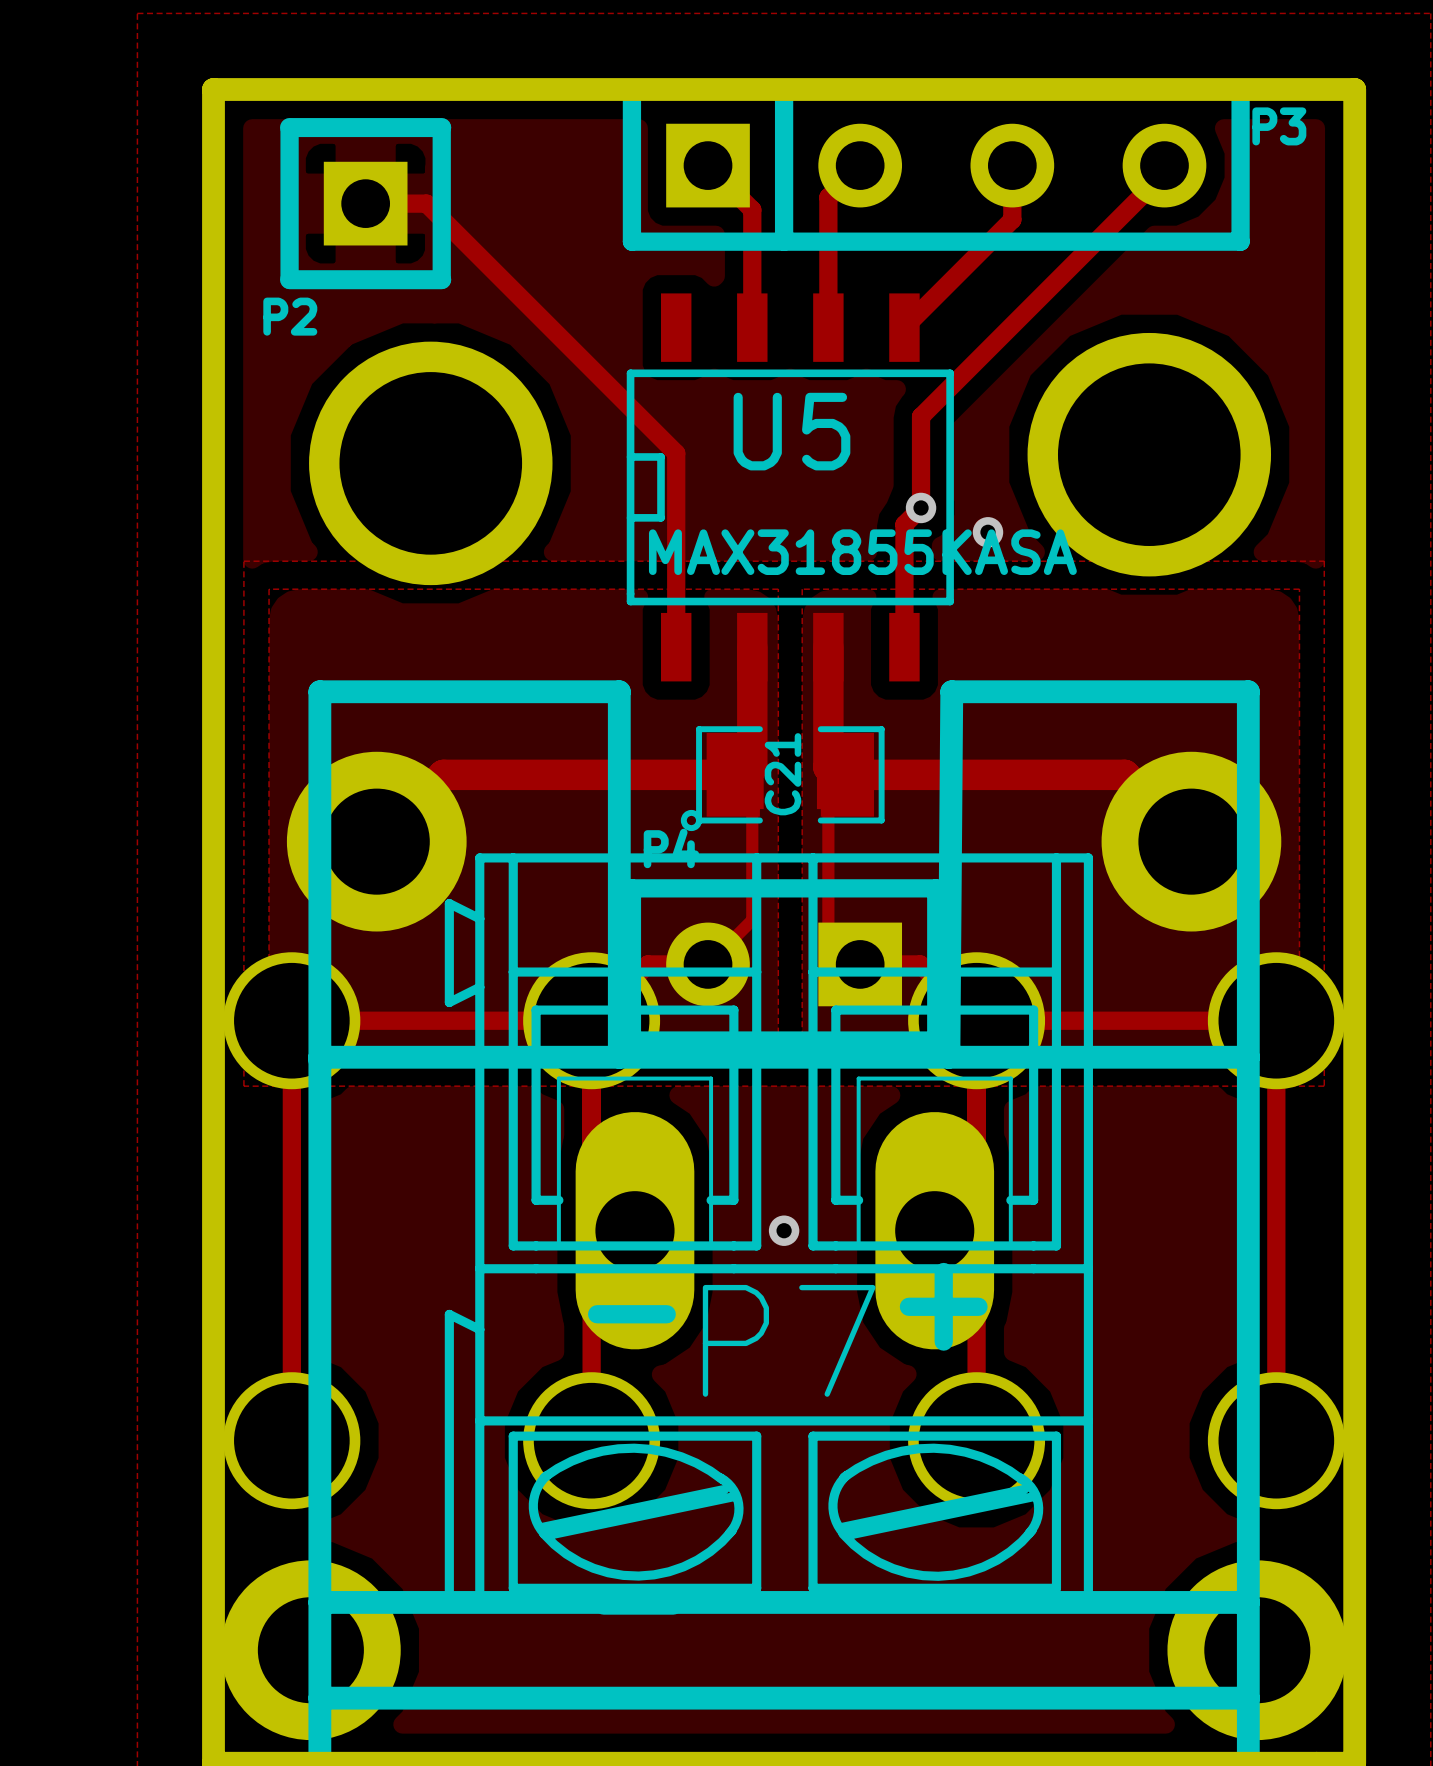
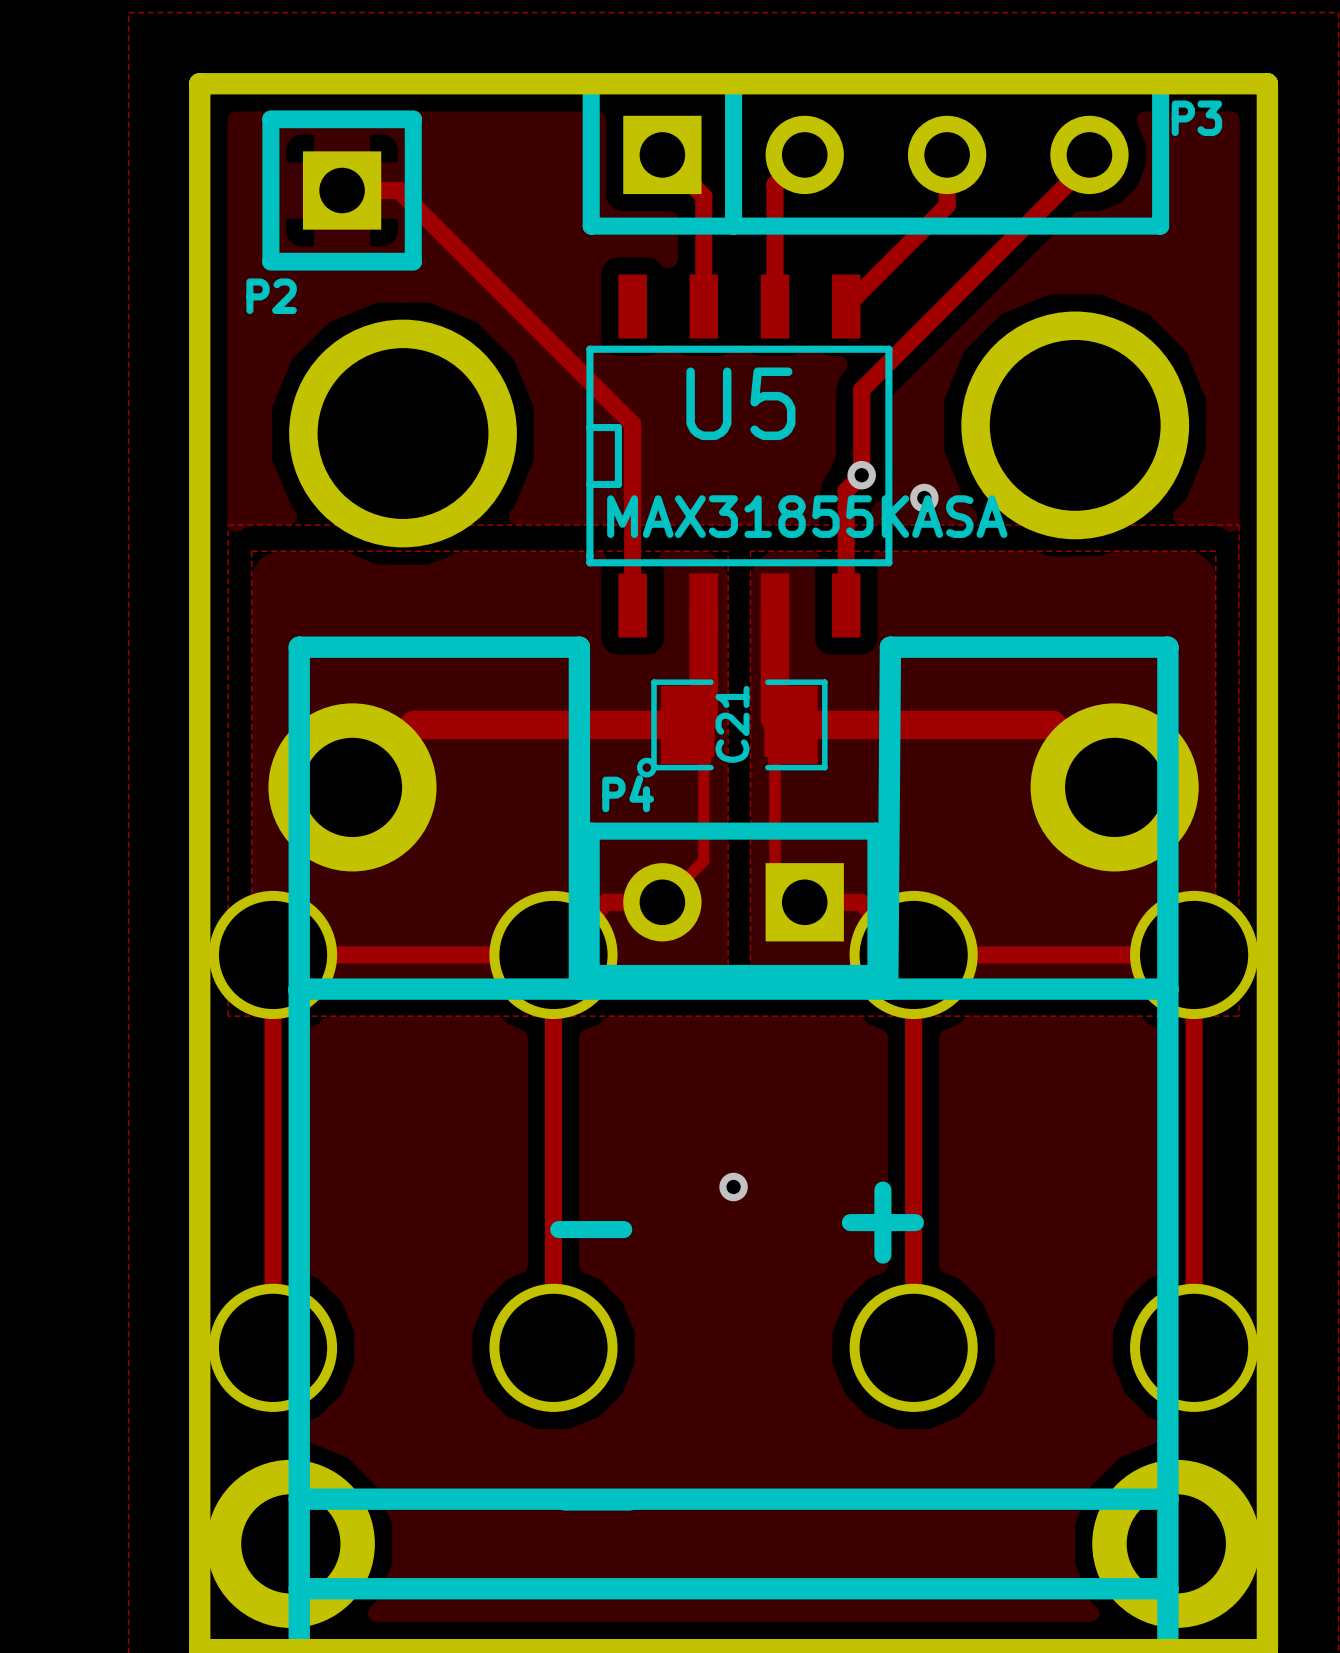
P7: (768, 1230) -> none
via position: (784, 1230) -> (733, 1187)

